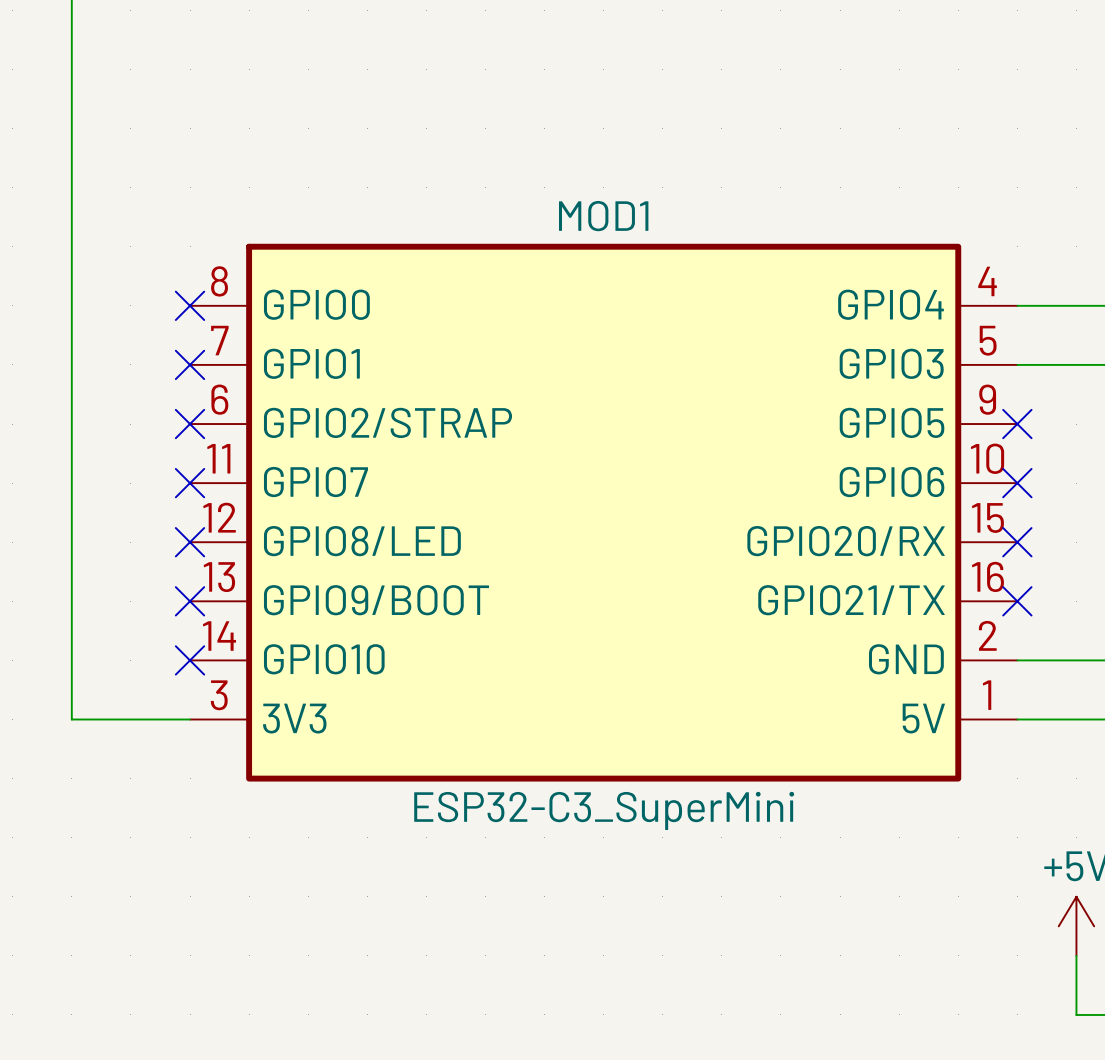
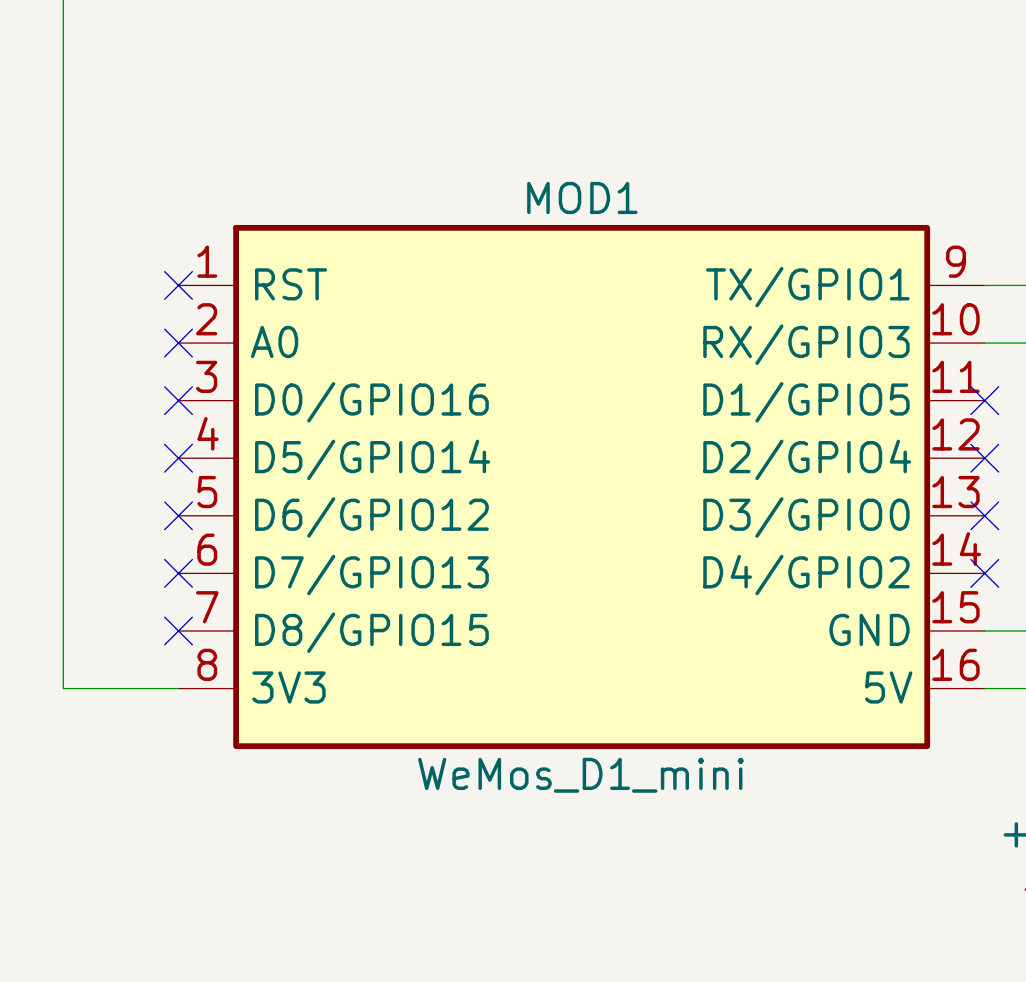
MOD1 symbol: [190, 243, 1018, 782] -> [178, 224, 985, 750]
MOD1 value: ESP32-C3_SuperMini (604, 810) -> WeMos_D1_mini (580, 775)

